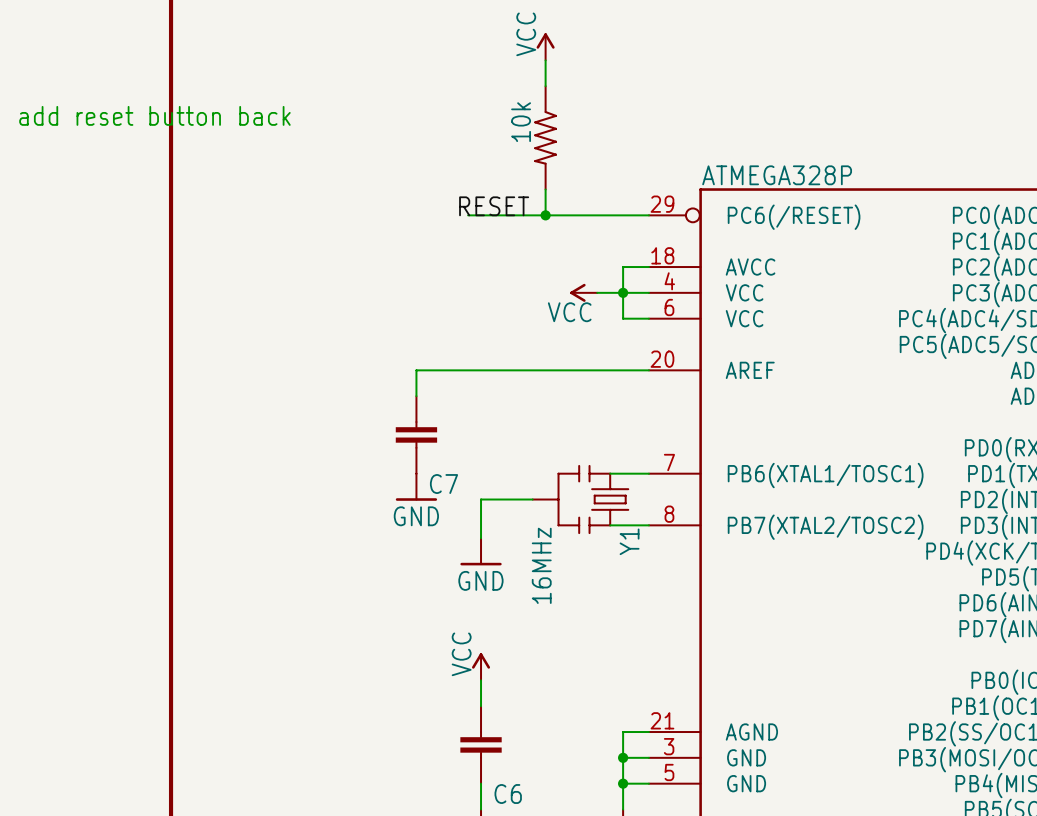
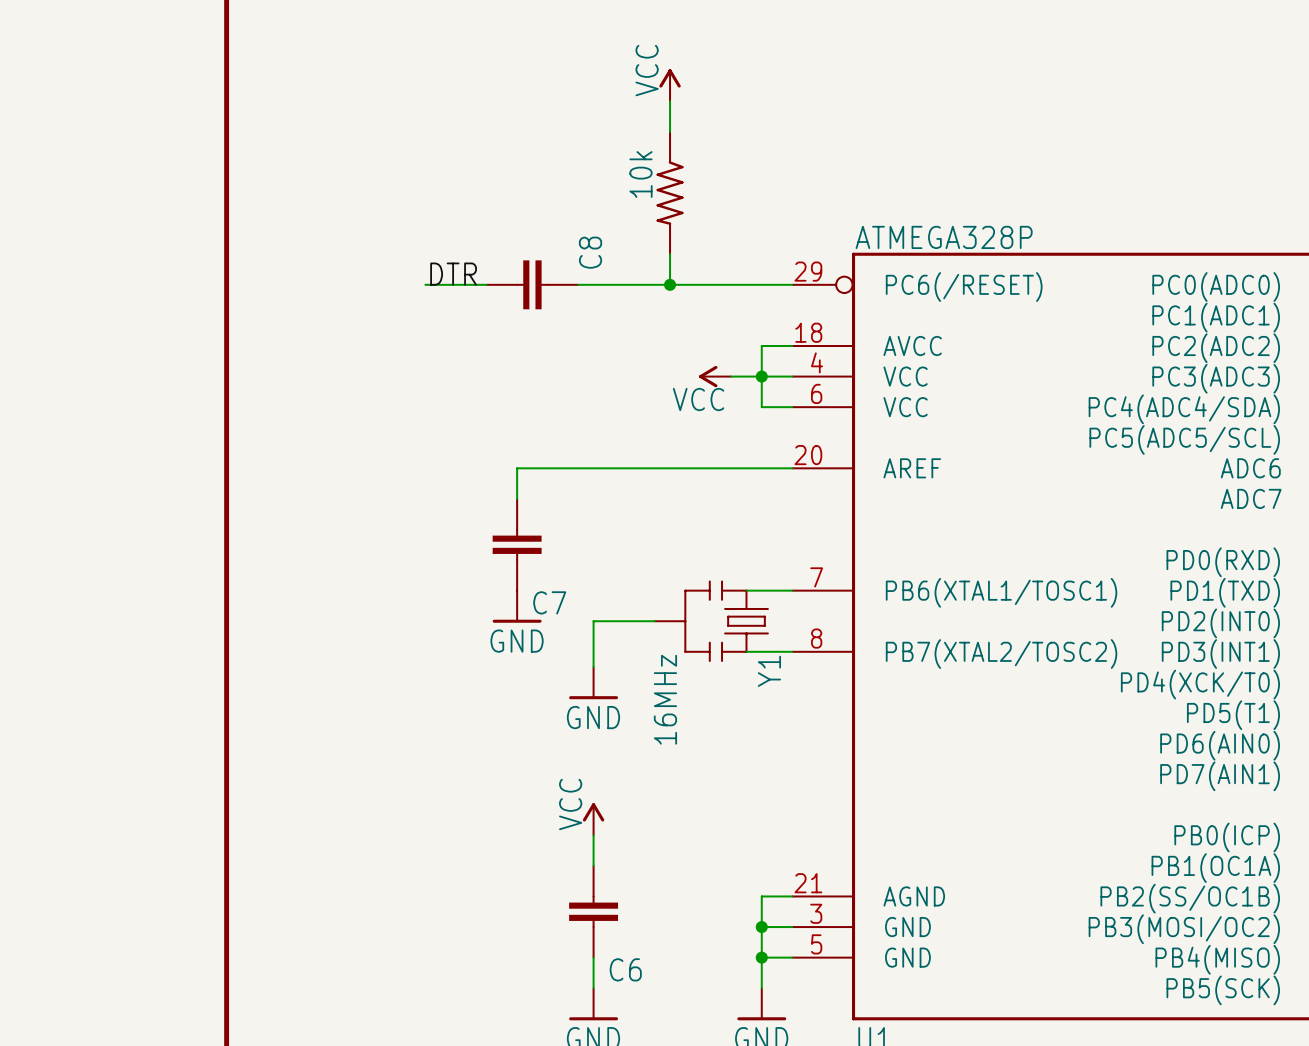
text: add reset button back (154, 115) -> none
label: none -> DTR (453, 274)
label: RESET (494, 206) -> none
wire: none -> (425, 284) (486, 284)
C8: none -> (532, 284)

